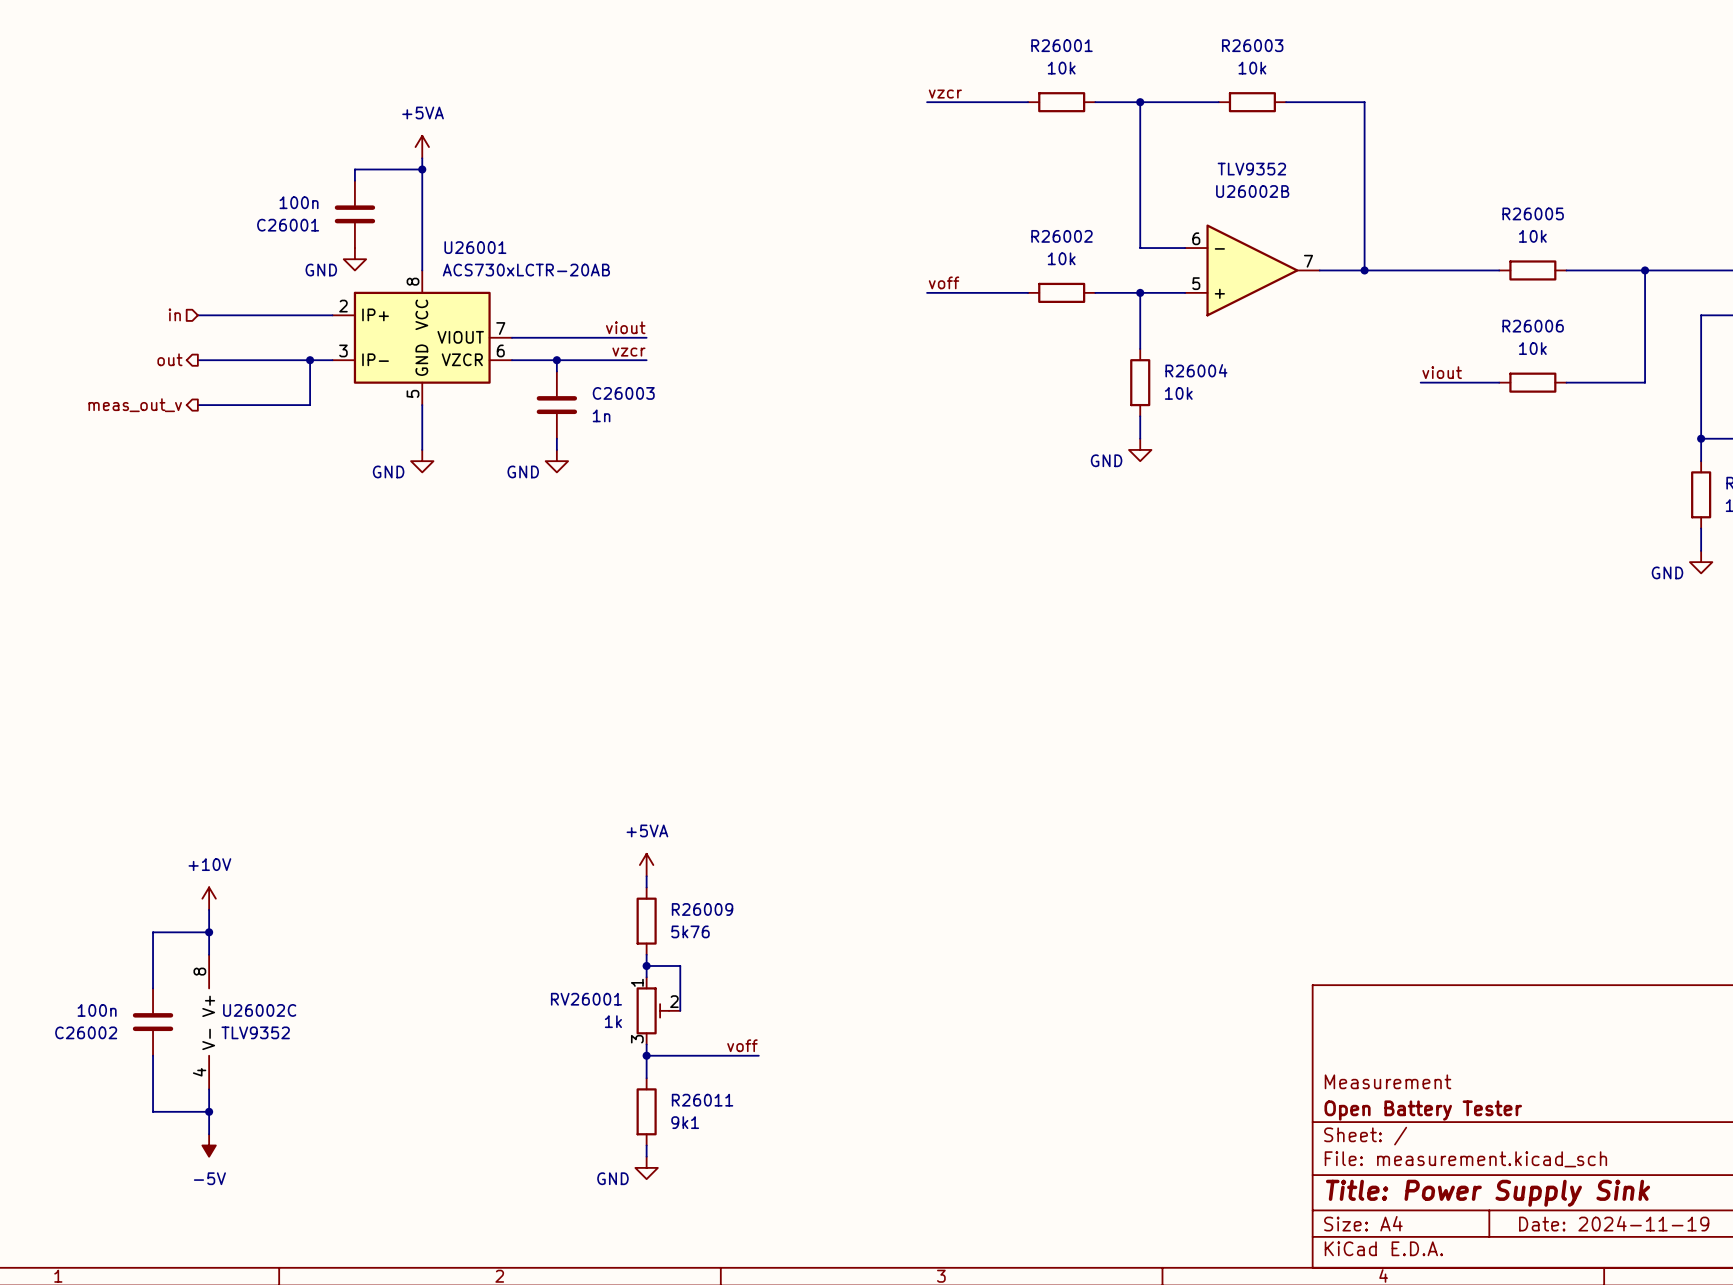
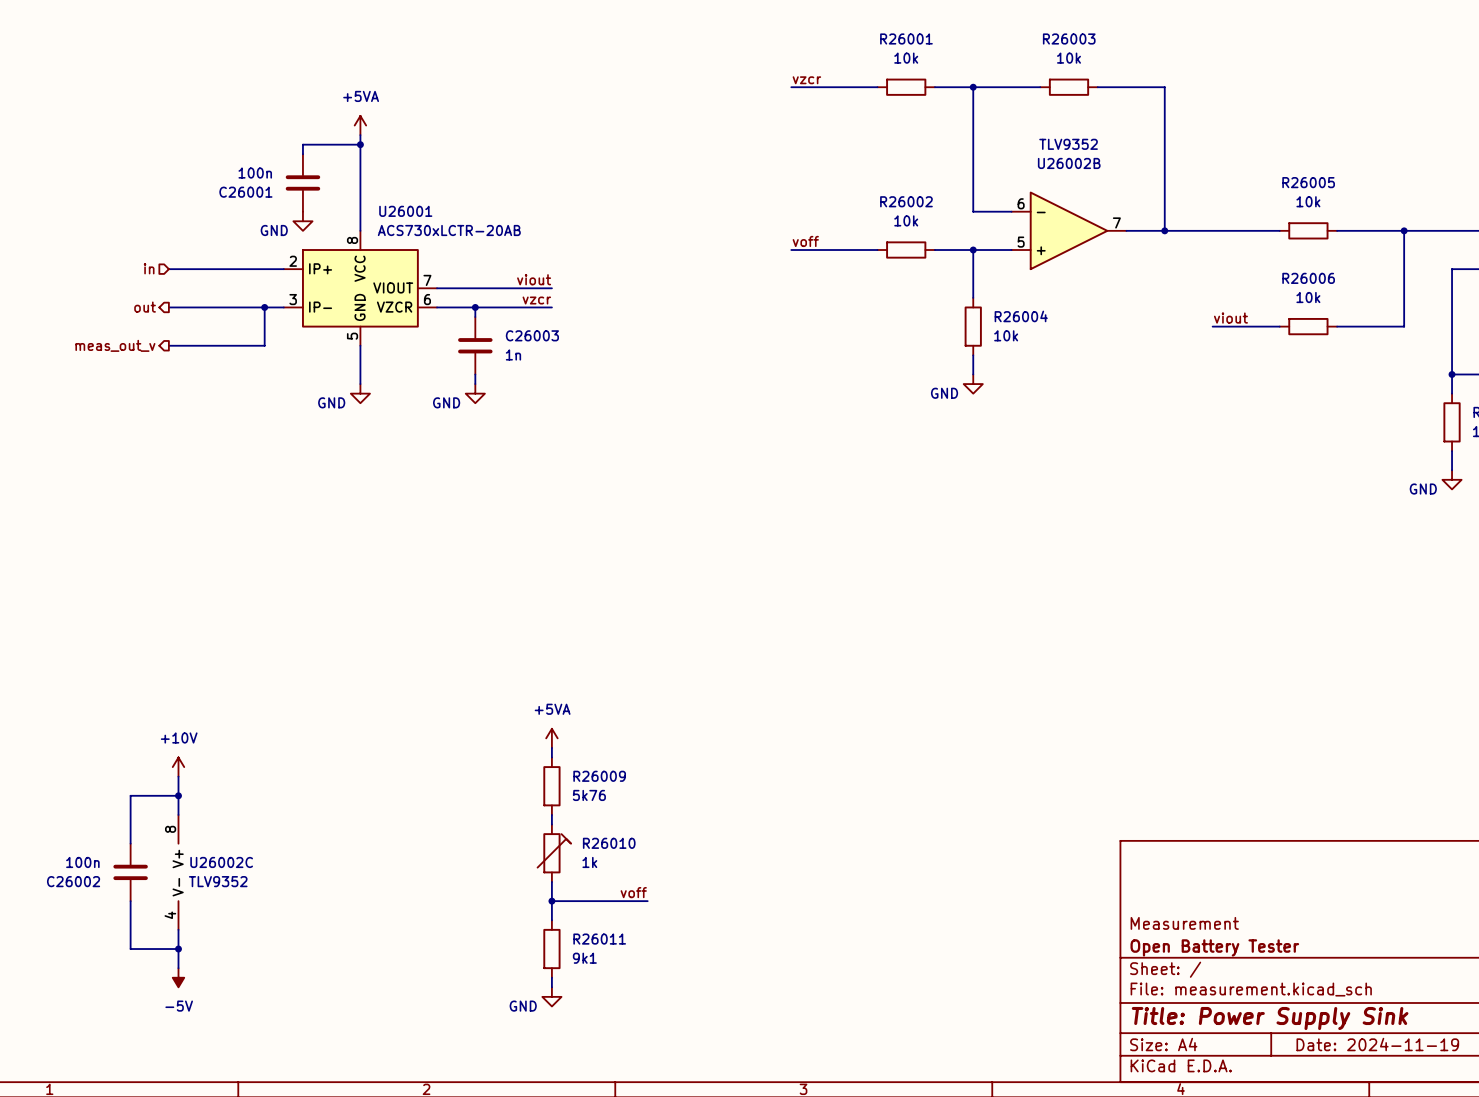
junction: (646, 965) -> none
wire: (646, 977) (646, 965) (680, 965) (680, 1010) -> none
R26010: none -> 1k (554, 853)
RV26001: 1k (658, 1010) -> none

